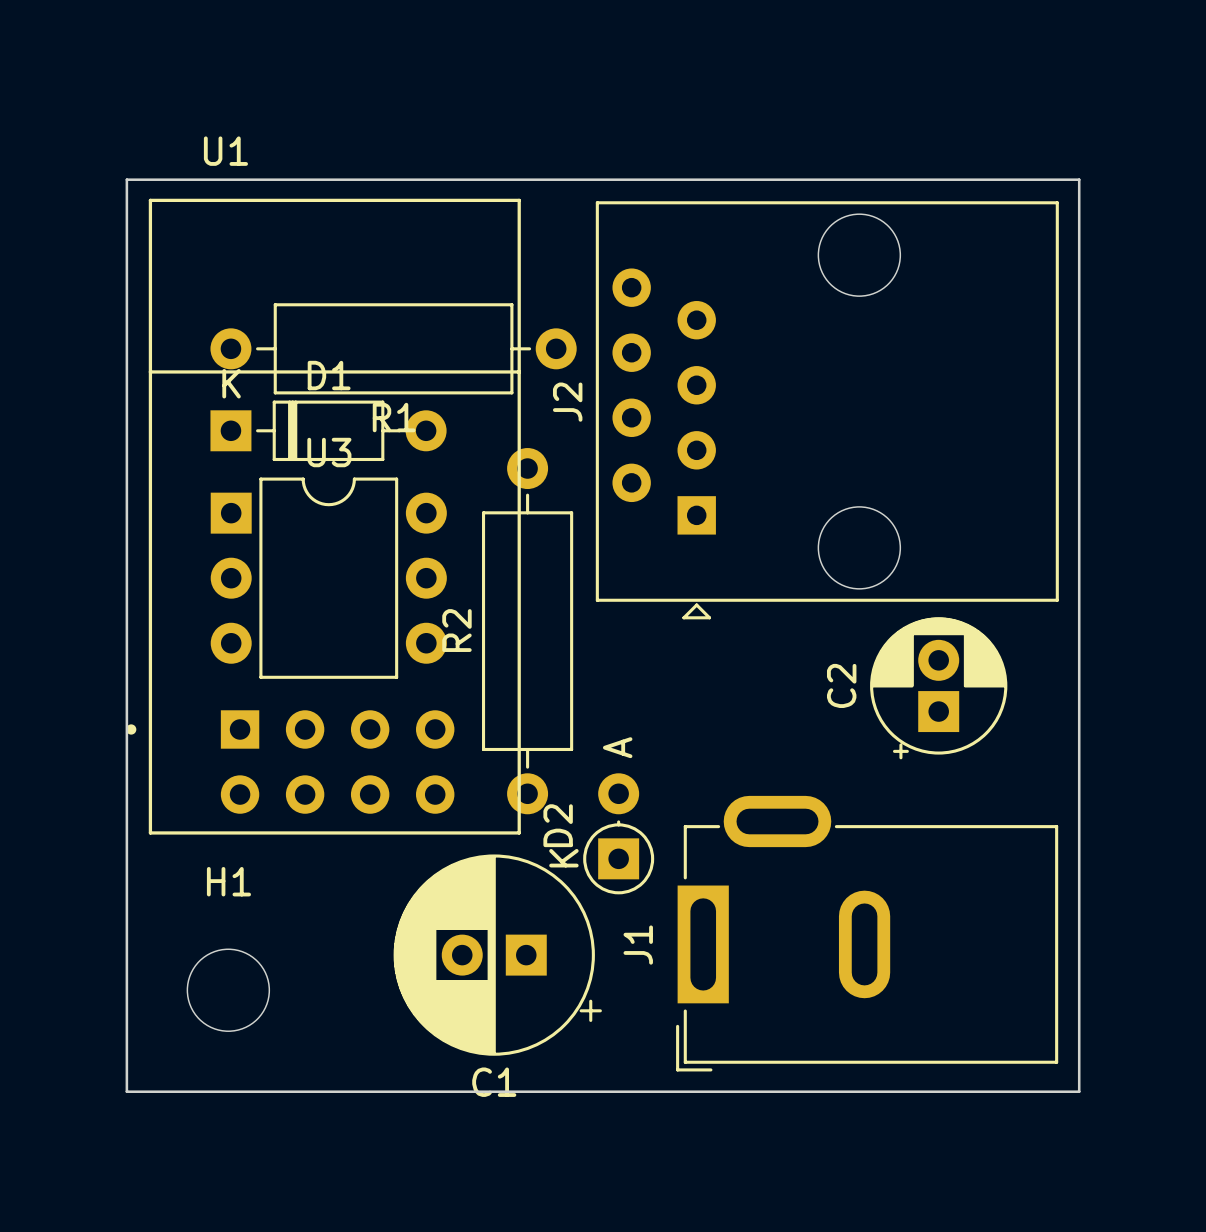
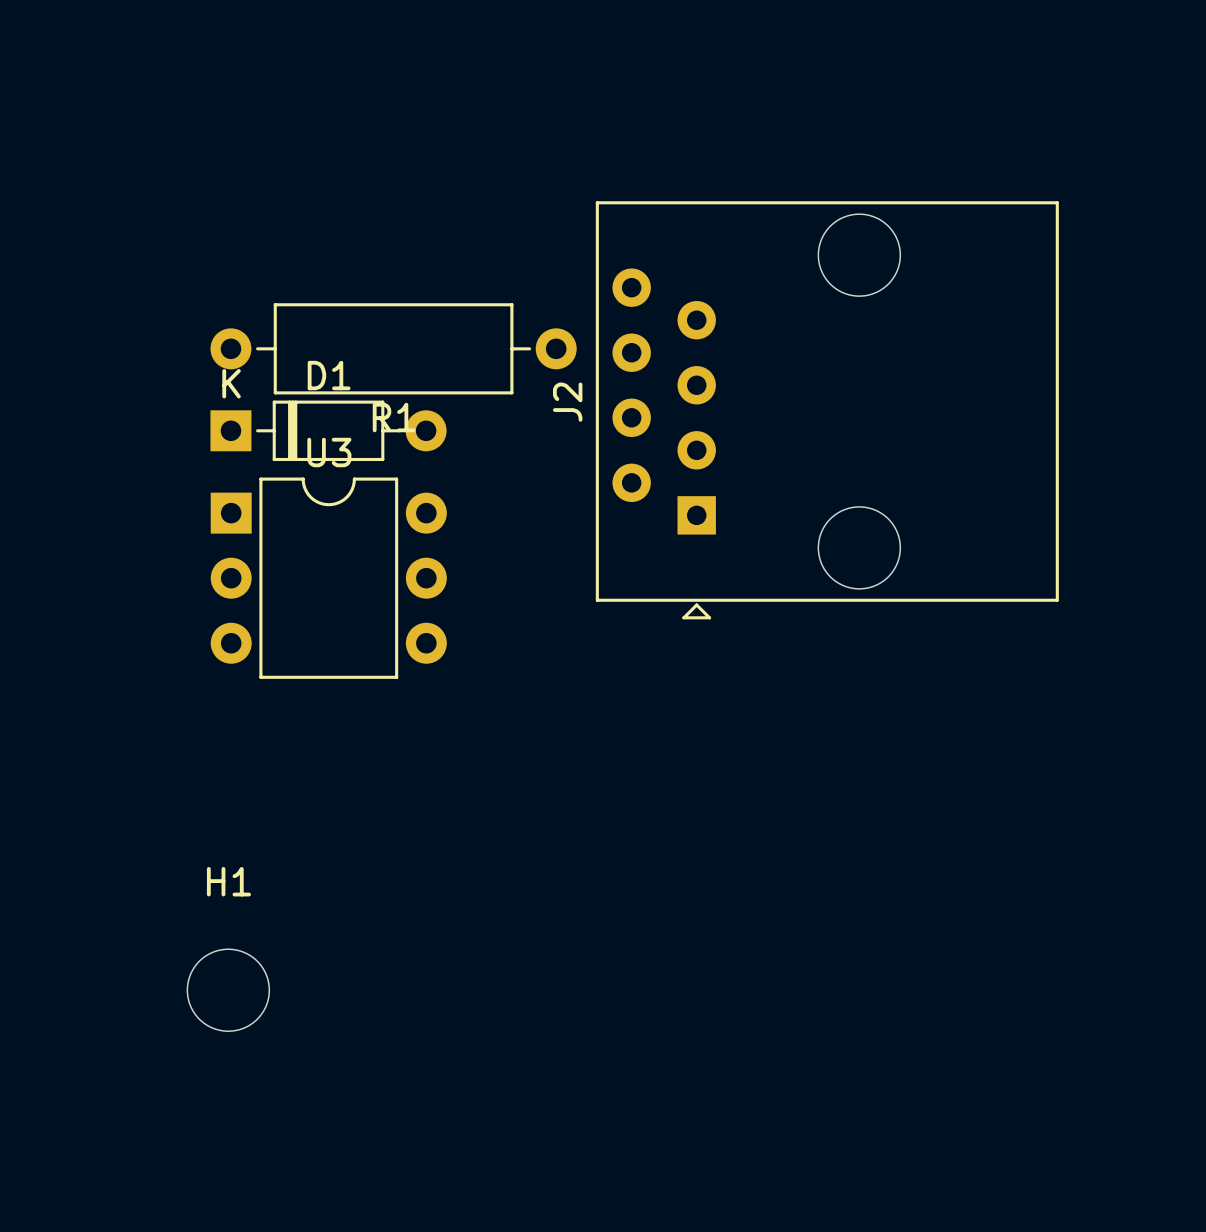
board edge: (126, 179) (1079, 179) (1079, 1091) (126, 1091) (126, 179) -> none
U1: (323, 516) -> none
R2: (527, 631) -> none
C2: (938, 688) -> none
D2: (618, 833) -> none
J1: (867, 933) -> none
C1: (497, 955) -> none

